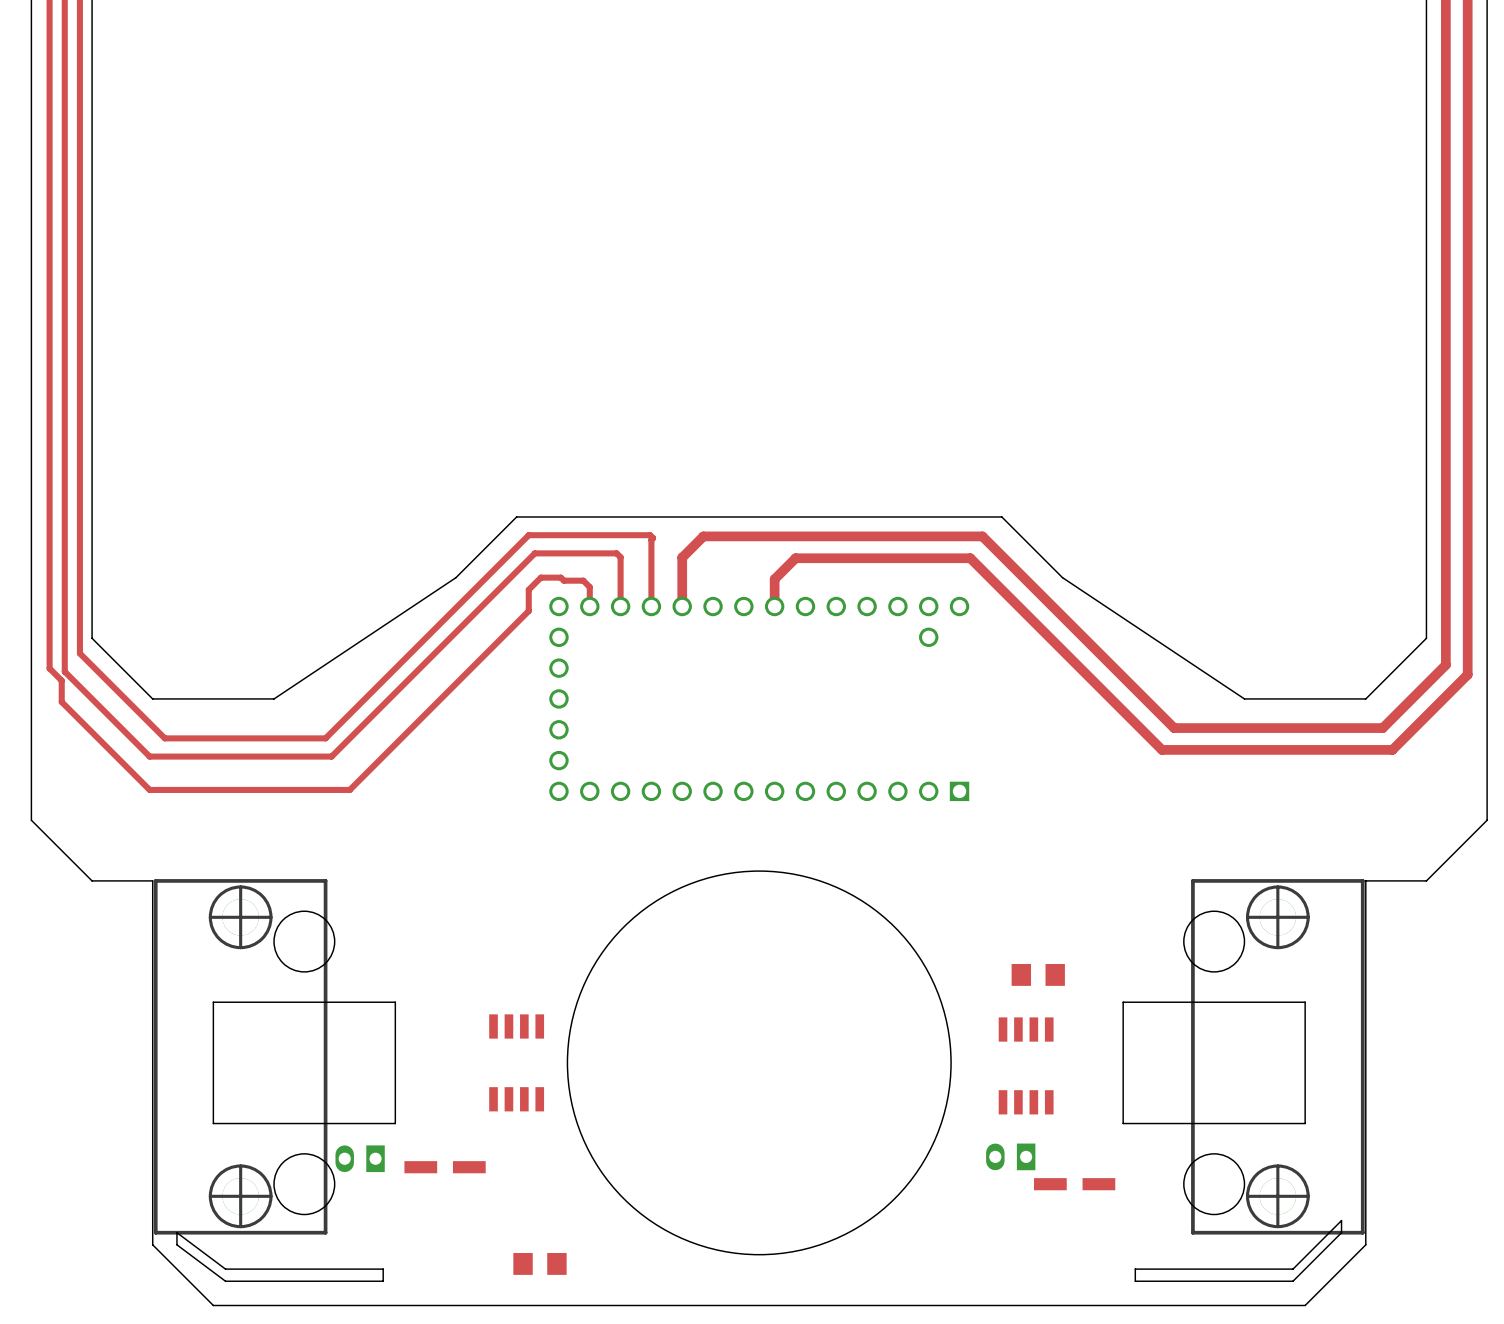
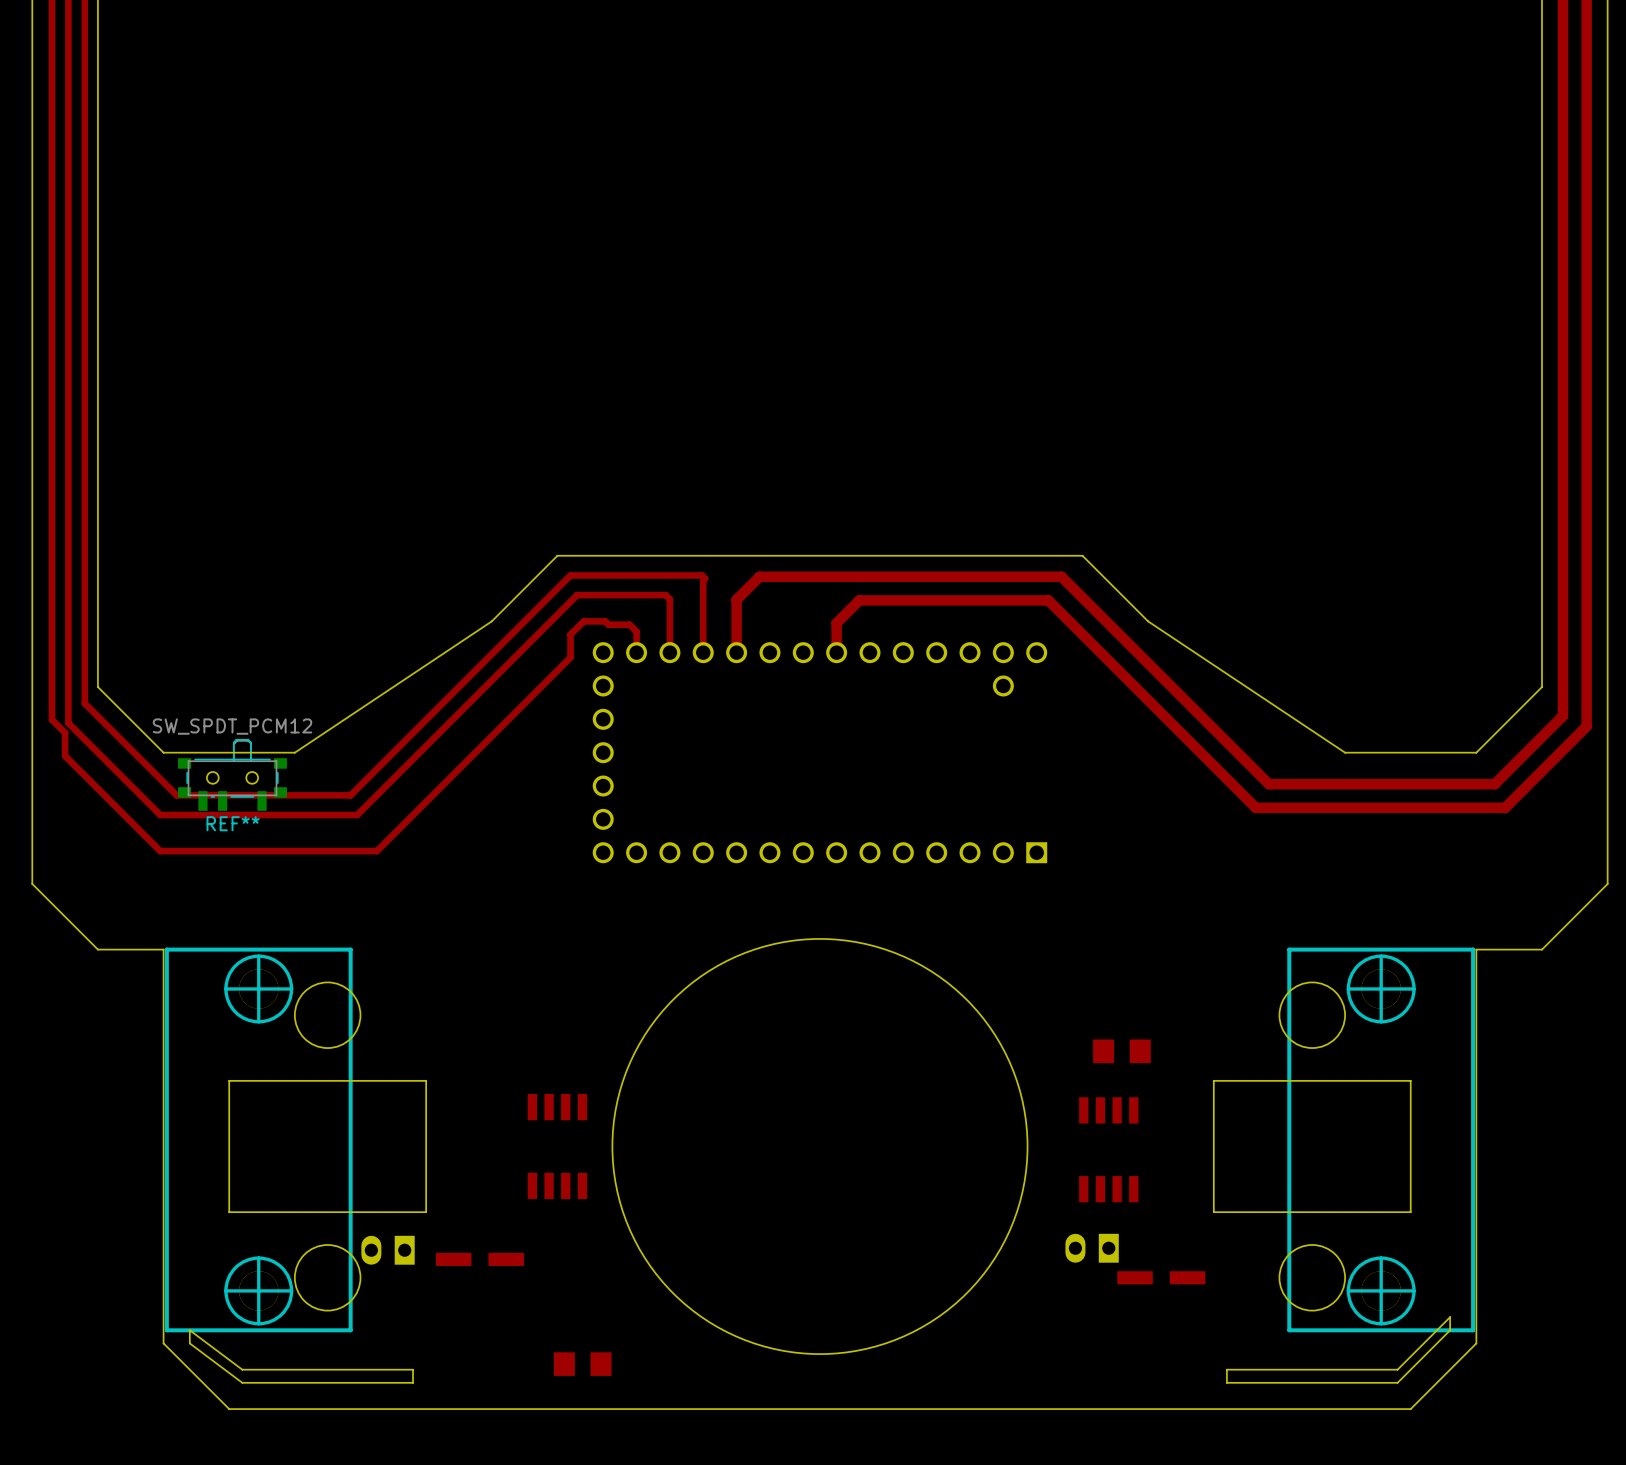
REF**: none -> SW_SPDT_PCM12 (232, 774)

